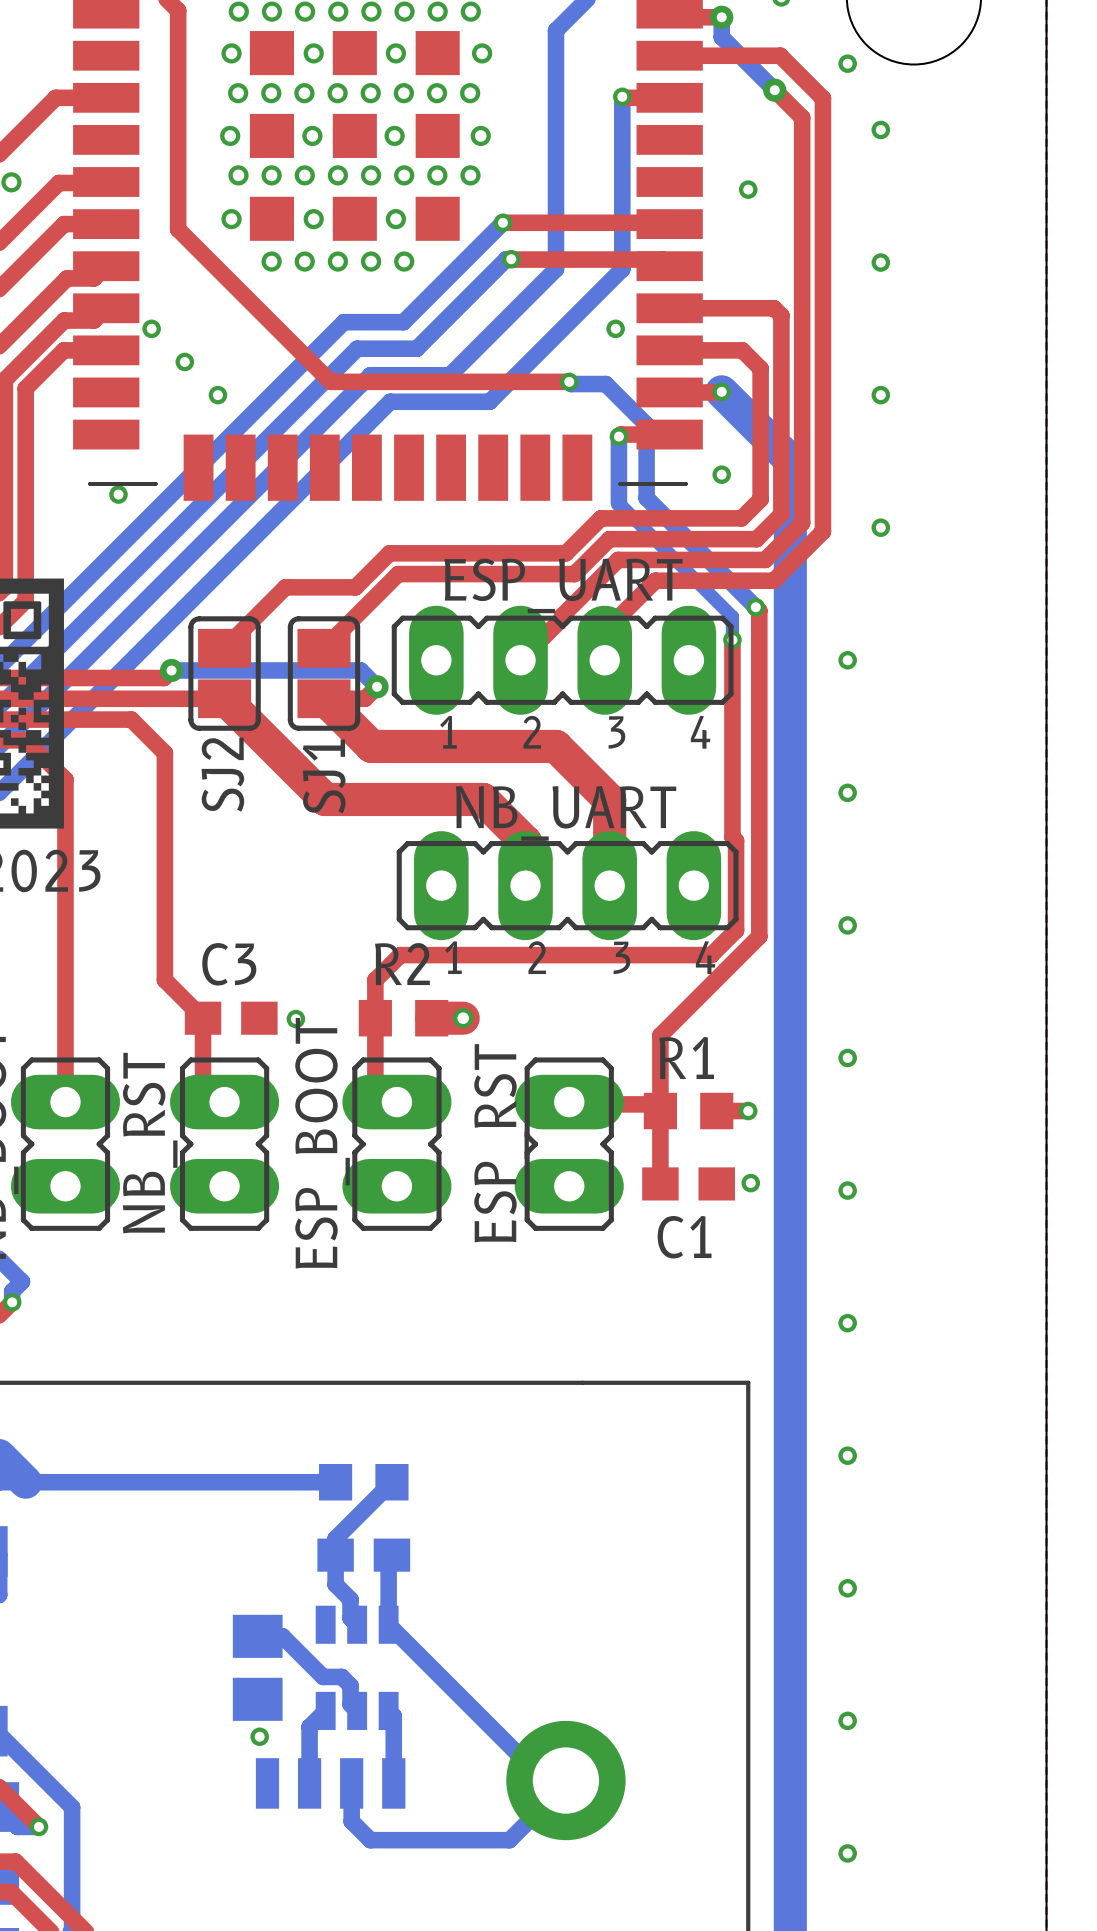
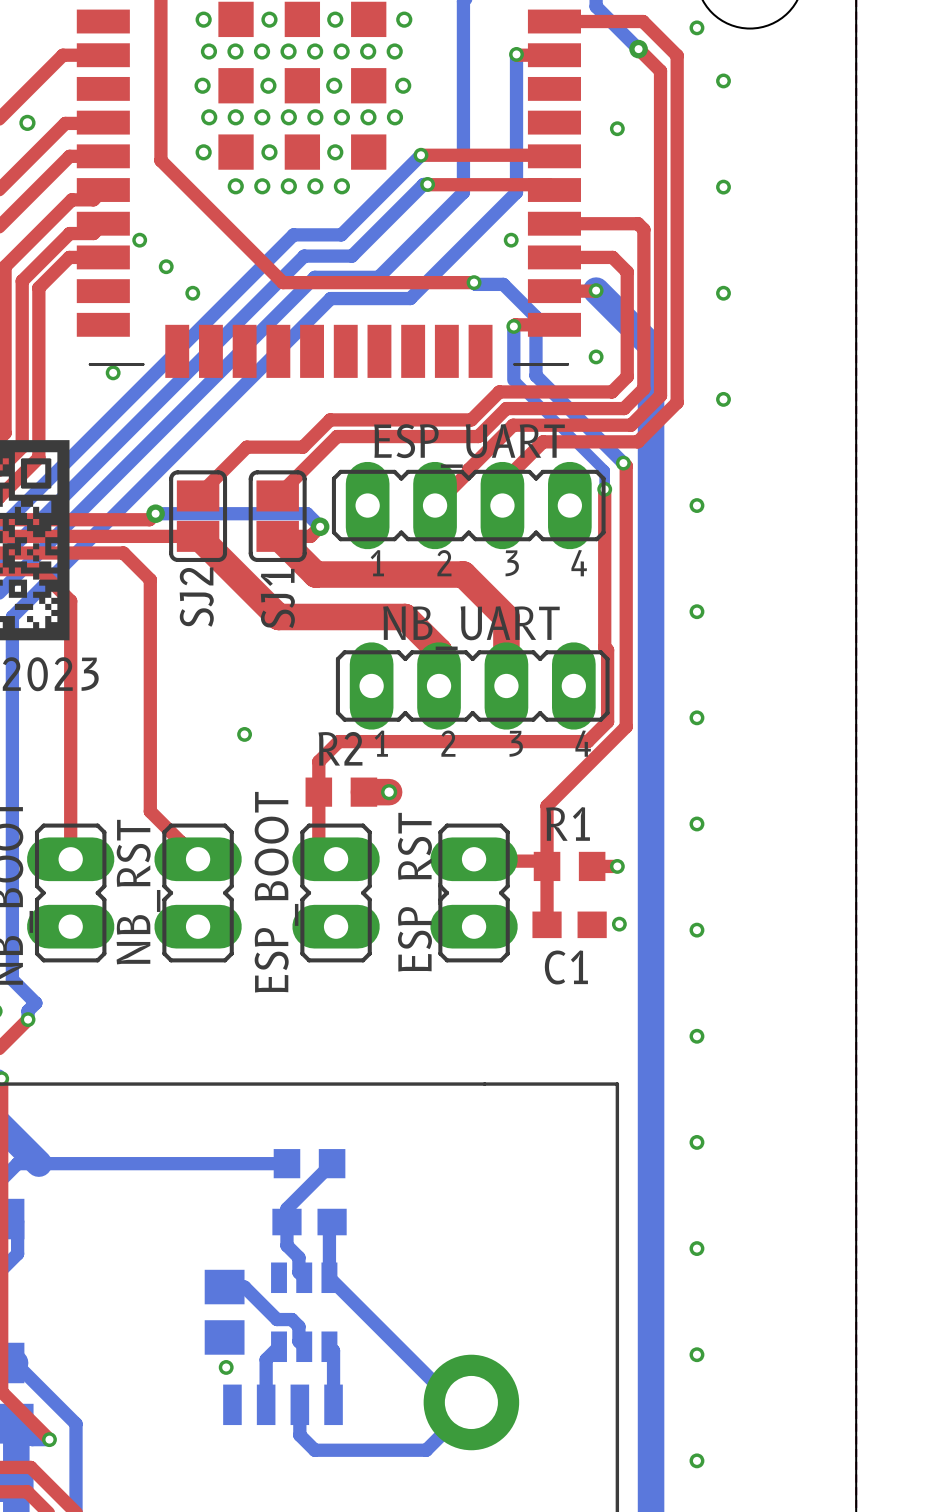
top track: (164, 980) (203, 1018) (203, 1080) -> (150, 761) (150, 811) (180, 842)
C3: (231, 1018) -> none
via position: (295, 1019) -> (244, 734)

